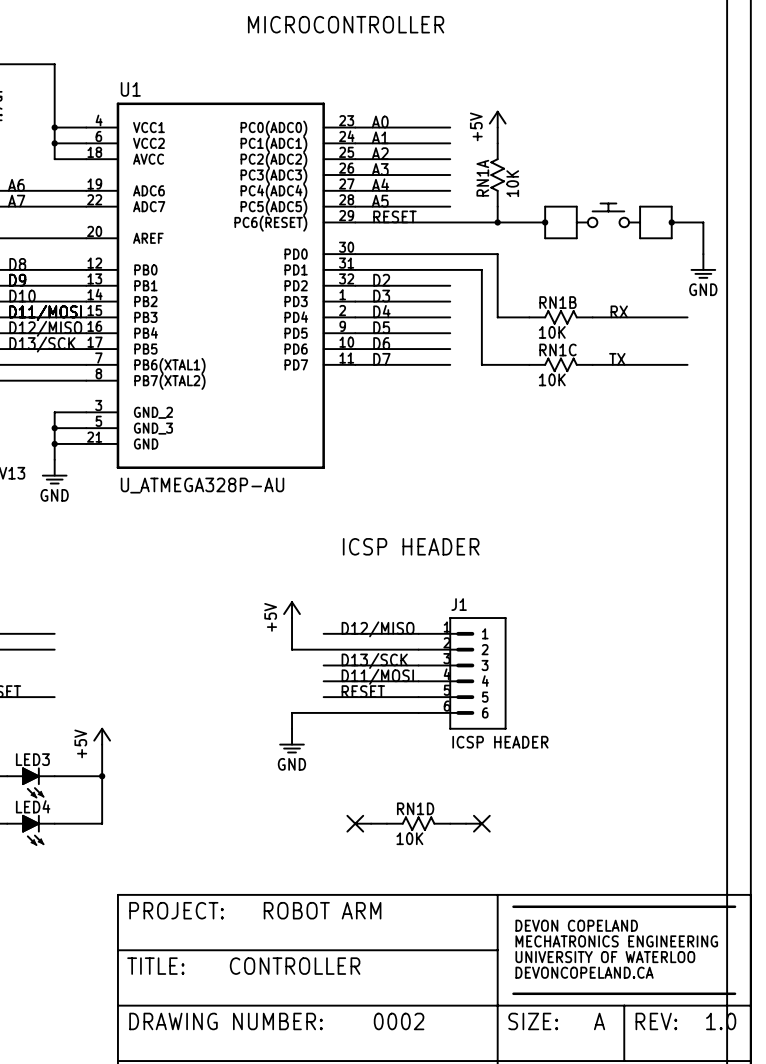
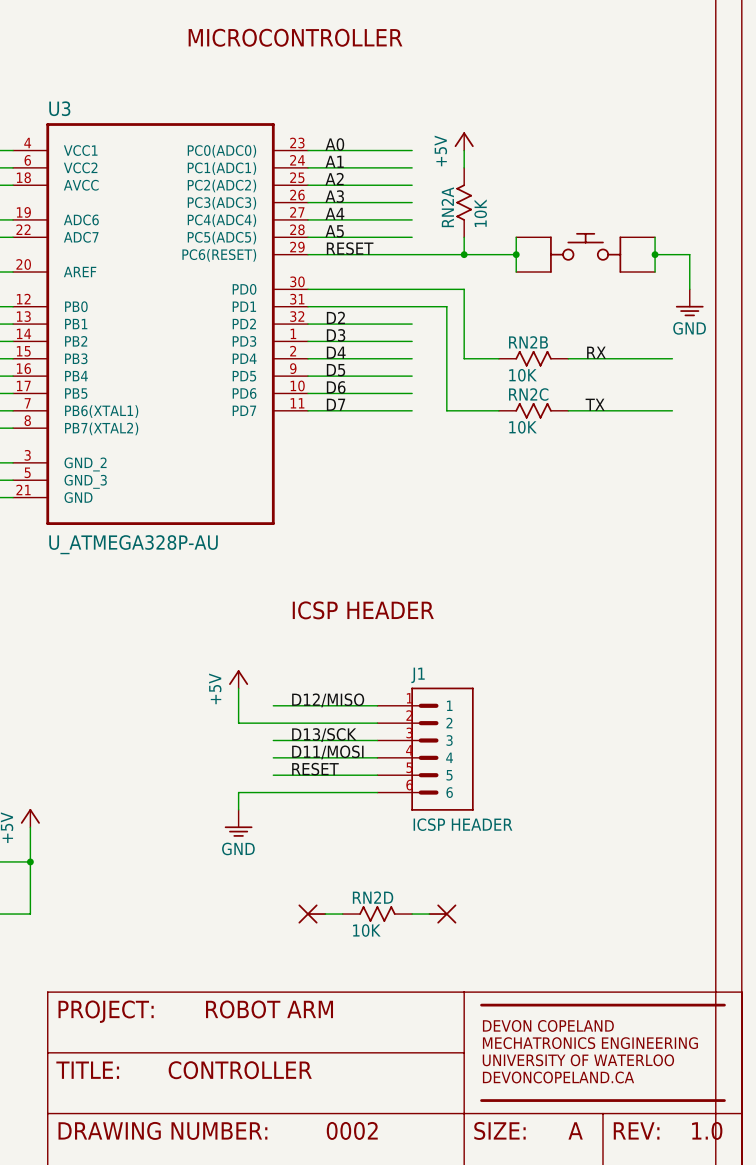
U1 name: U1 (130, 89) -> U3 (59, 108)
RN1A name: RN1A (482, 178) -> RN2A (447, 207)
RN1B name: RN1B (558, 302) -> RN2B (528, 342)
RN1C name: RN1C (558, 349) -> RN2C (528, 394)
RN1D name: RN1D (415, 808) -> RN2D (373, 897)

